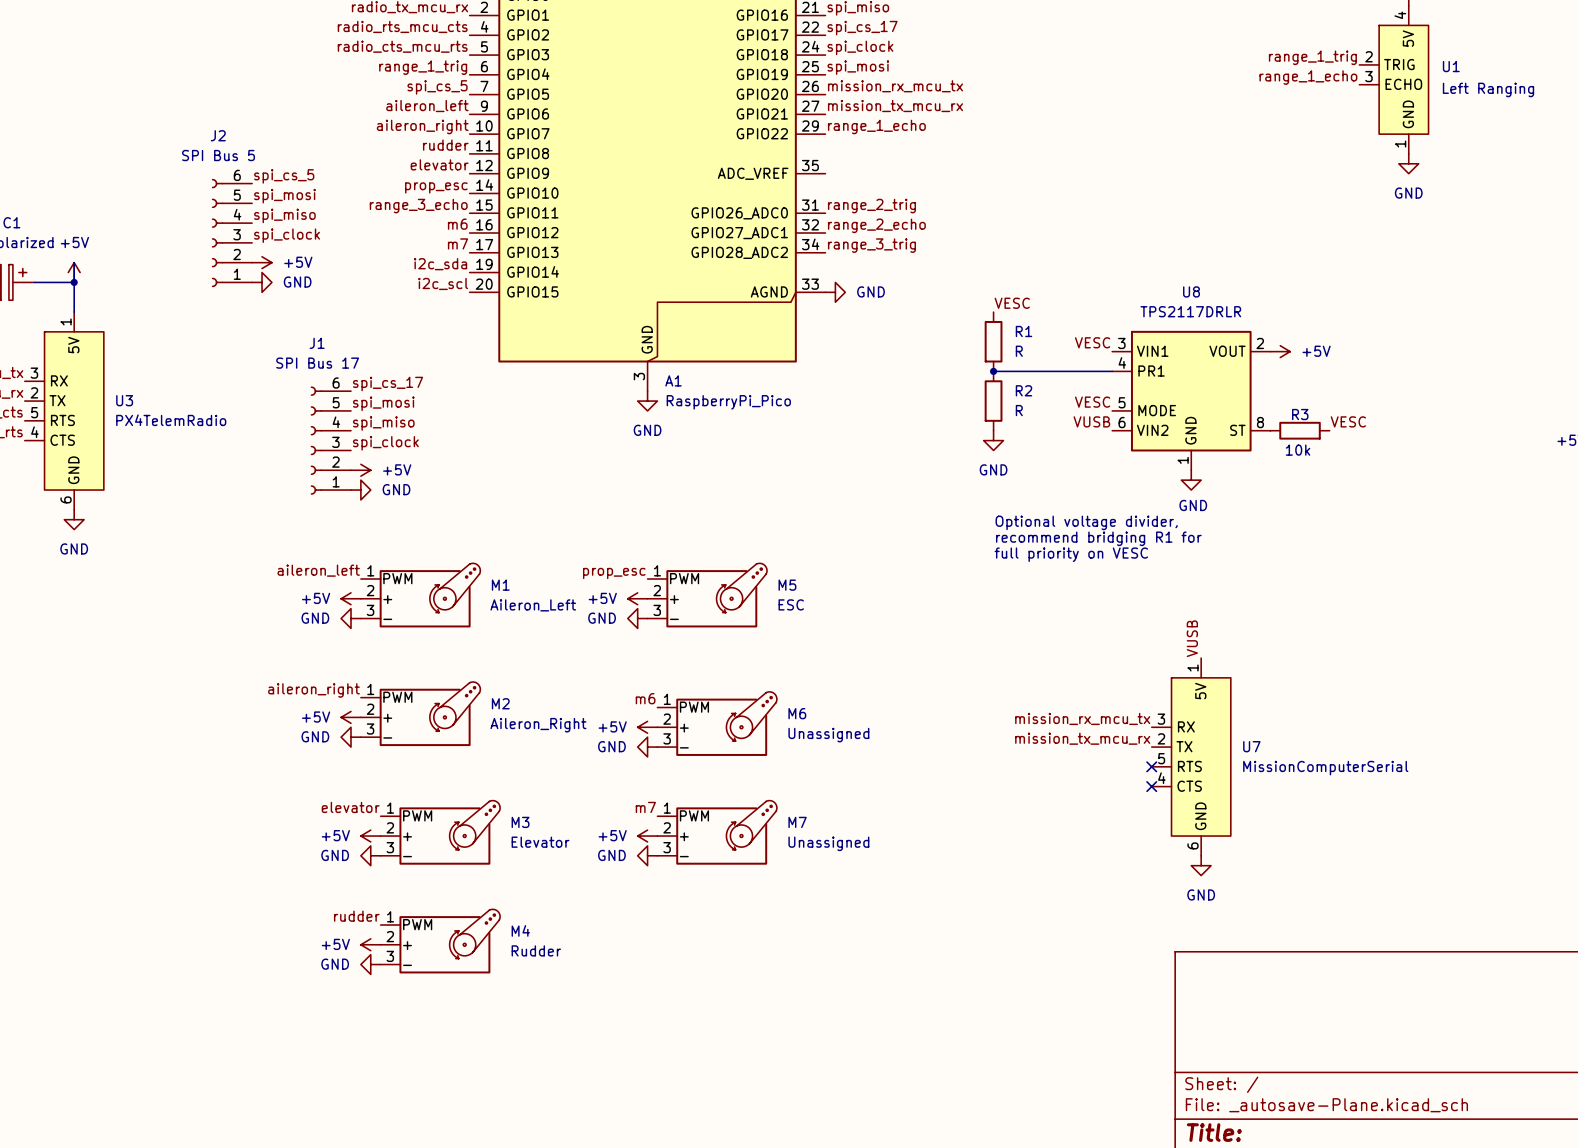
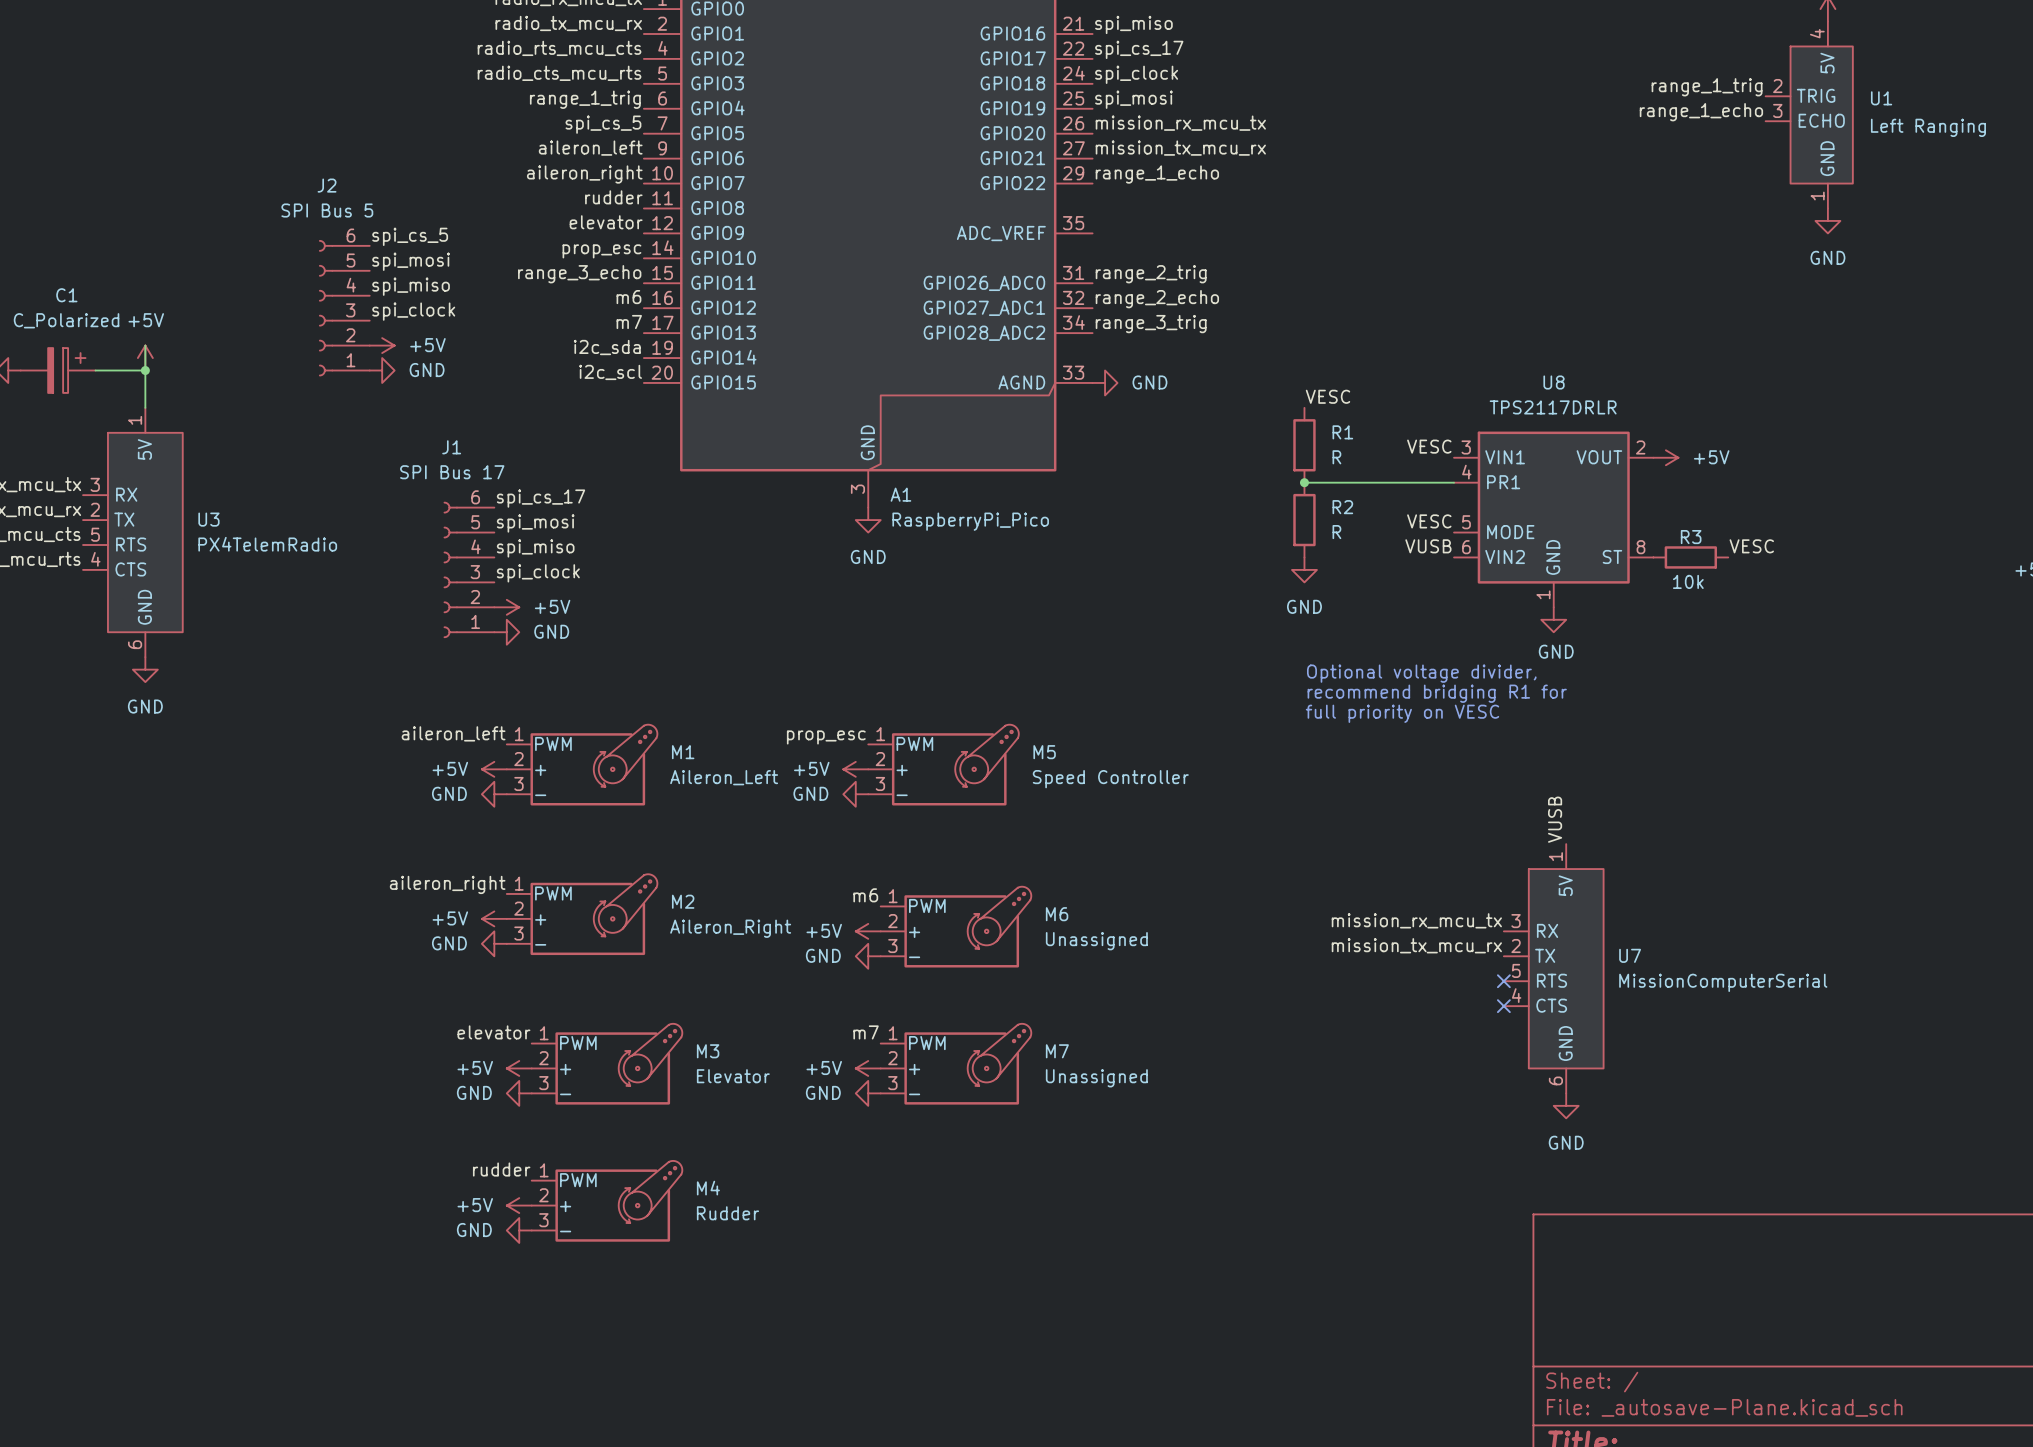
M5 value: ESC (791, 604) -> Speed Controller (1110, 779)

